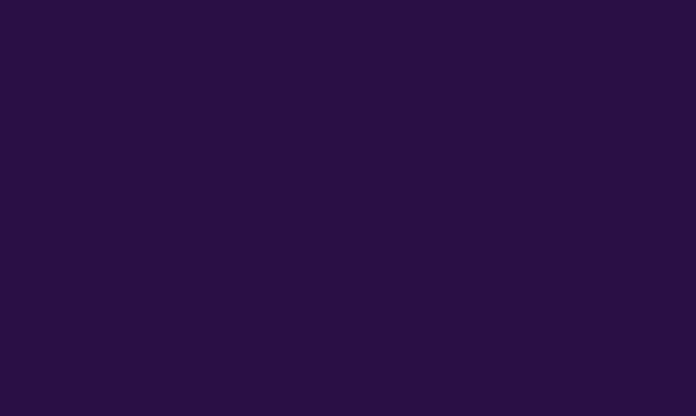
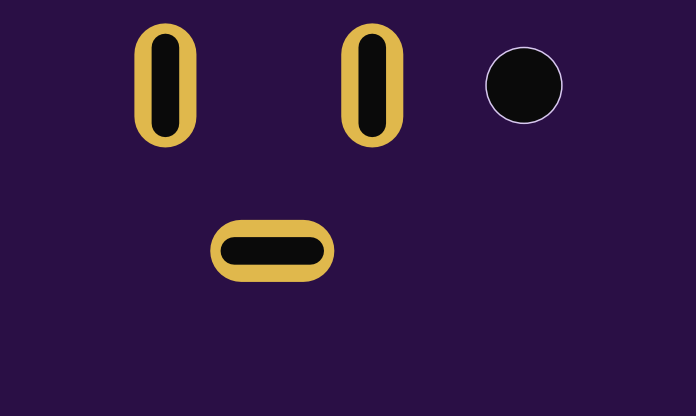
part: none -> (348, 152)

